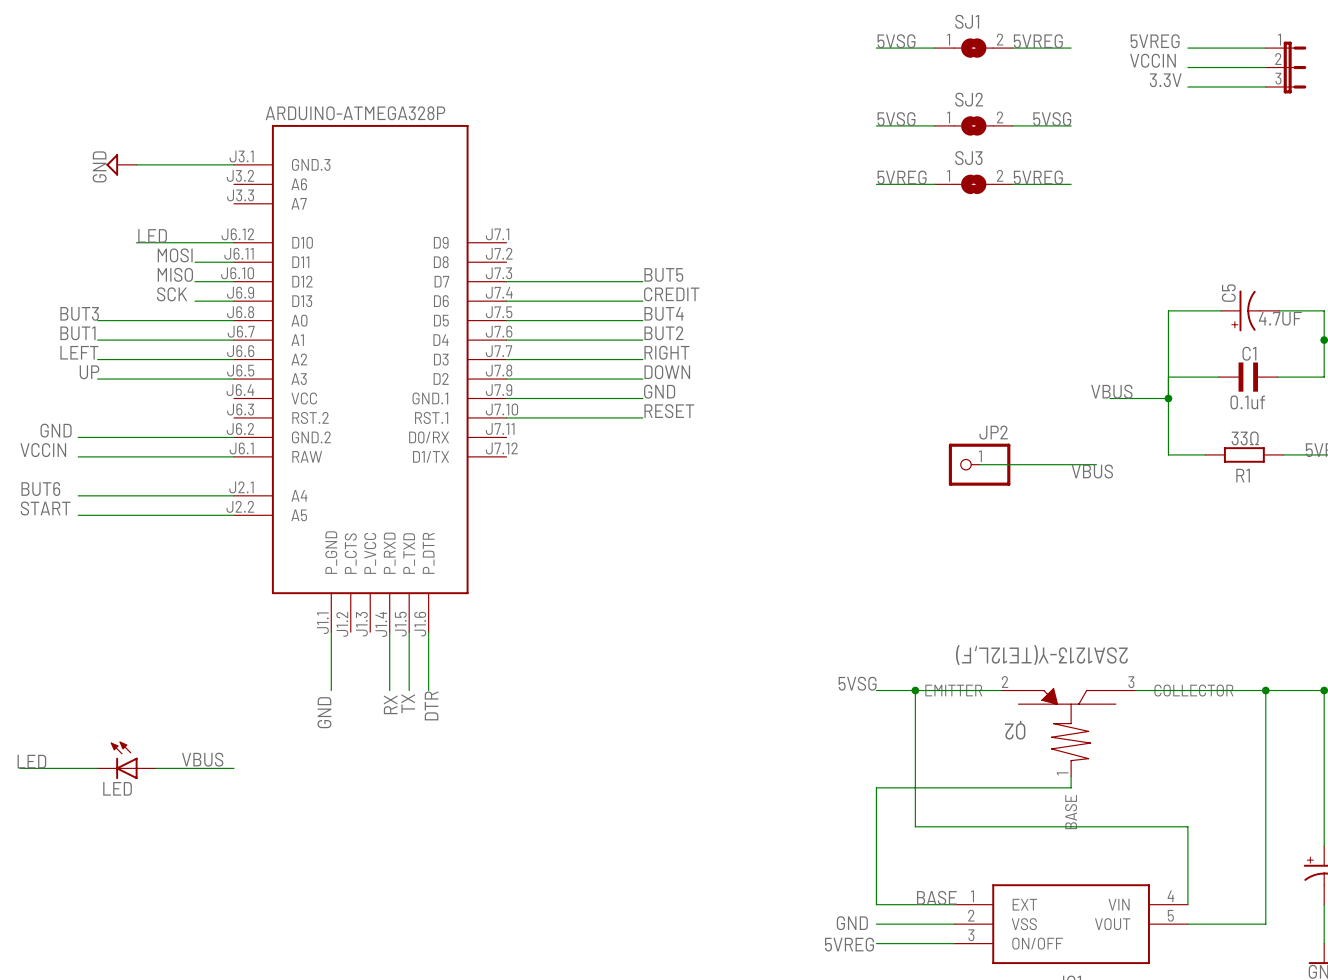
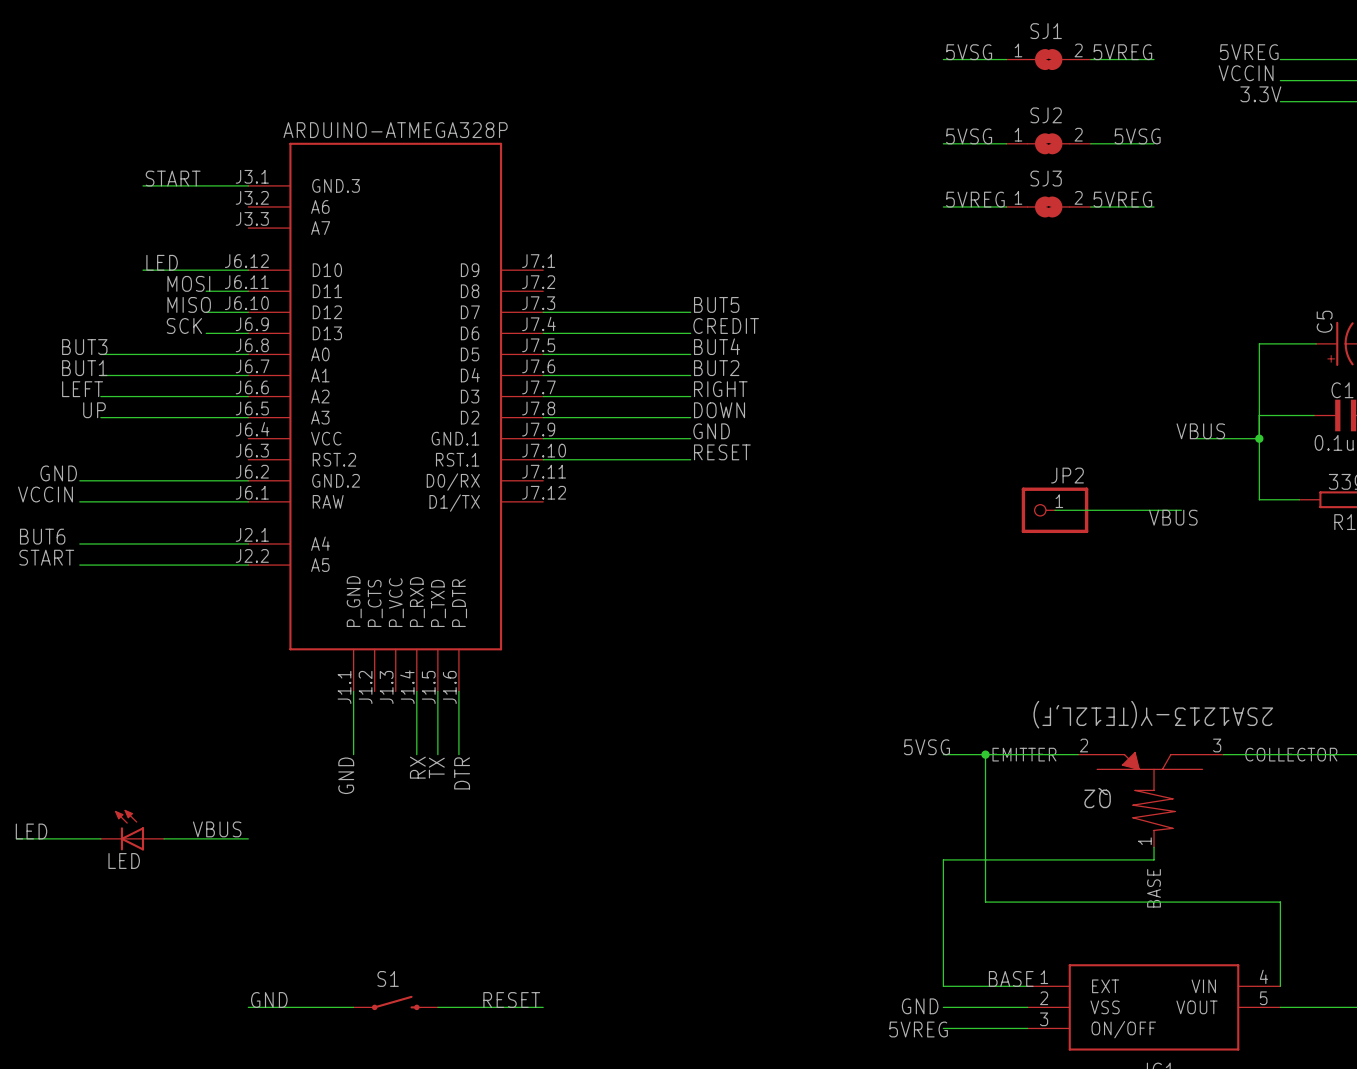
label: none -> START (173, 178)
power symbol: GND (121, 164) -> none
label: none -> GND (269, 1000)
label: none -> RESET (511, 1000)
S1: none -> (395, 1002)
wire: none -> (248, 1007) (353, 1007)
wire: none -> (437, 1007) (543, 1007)

